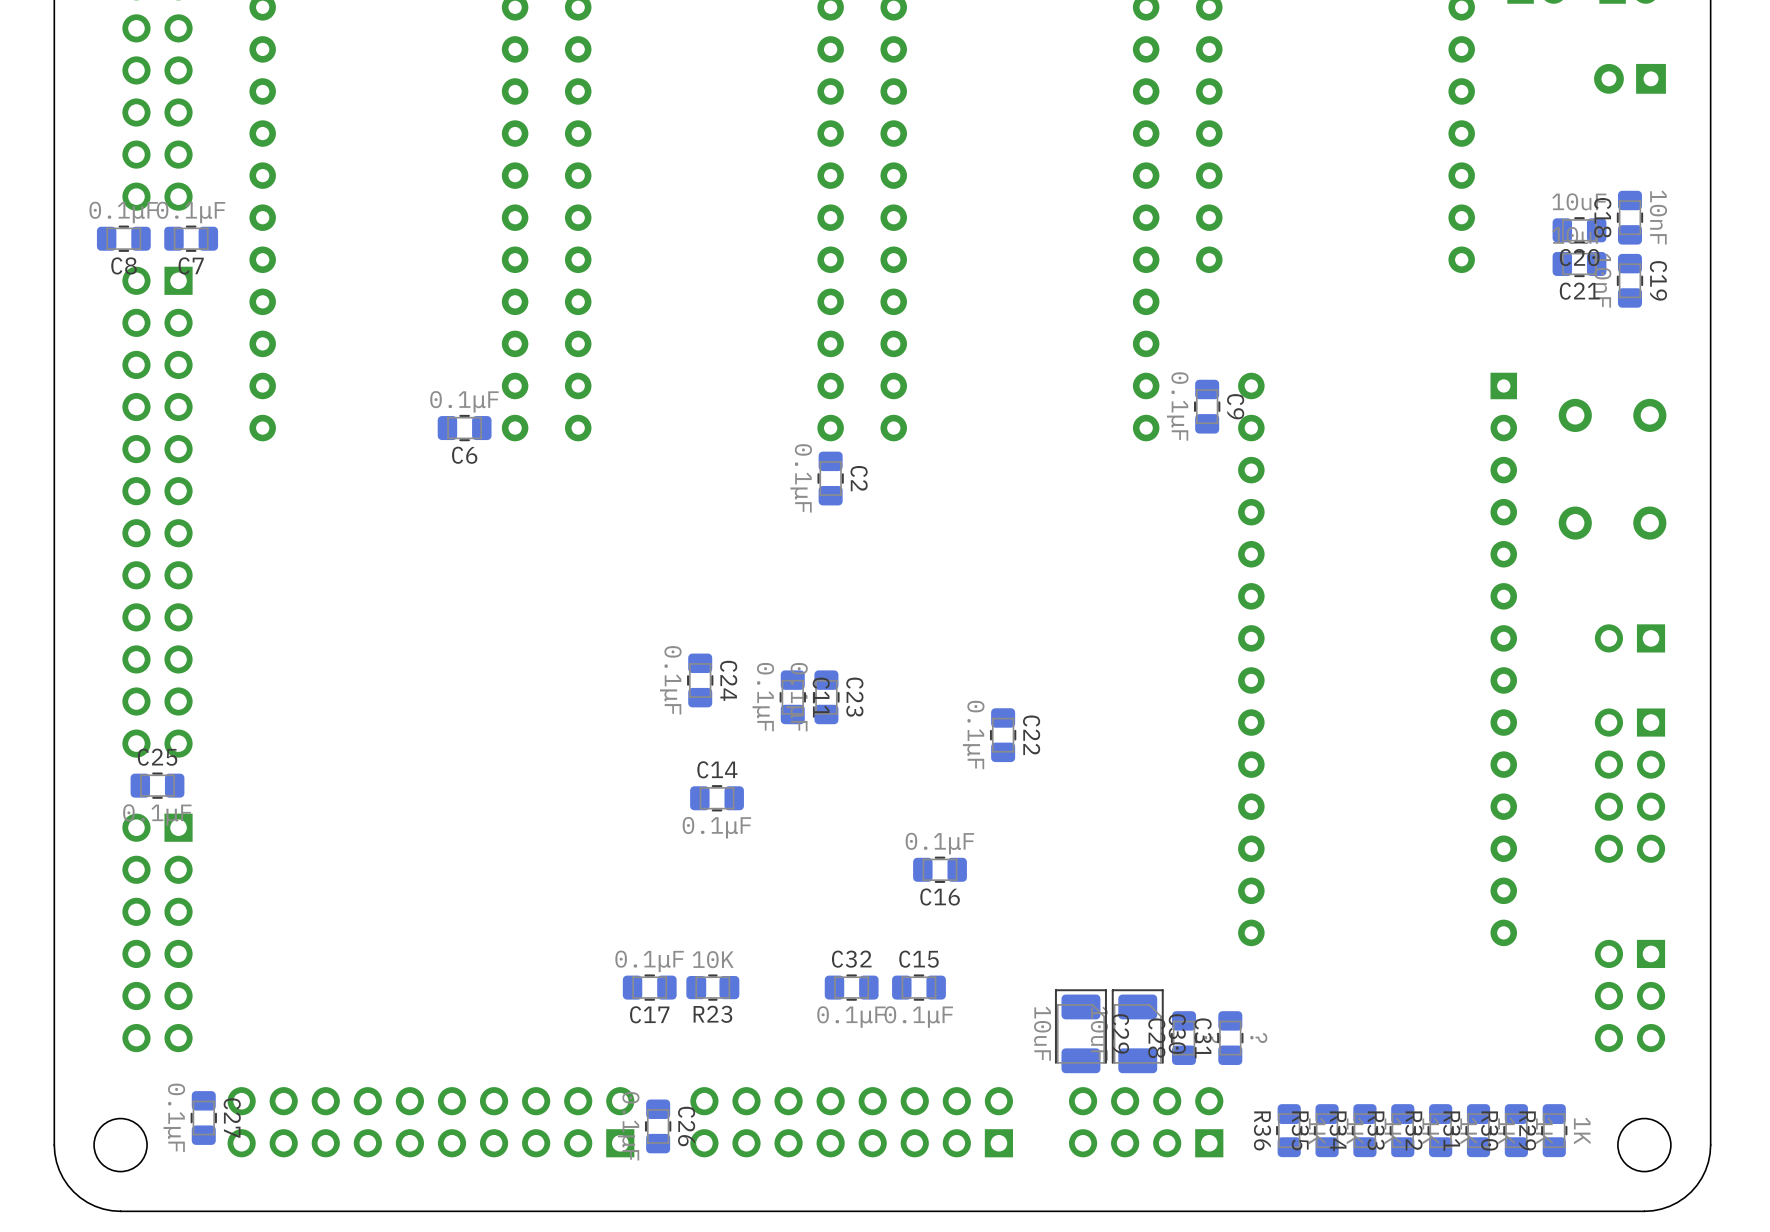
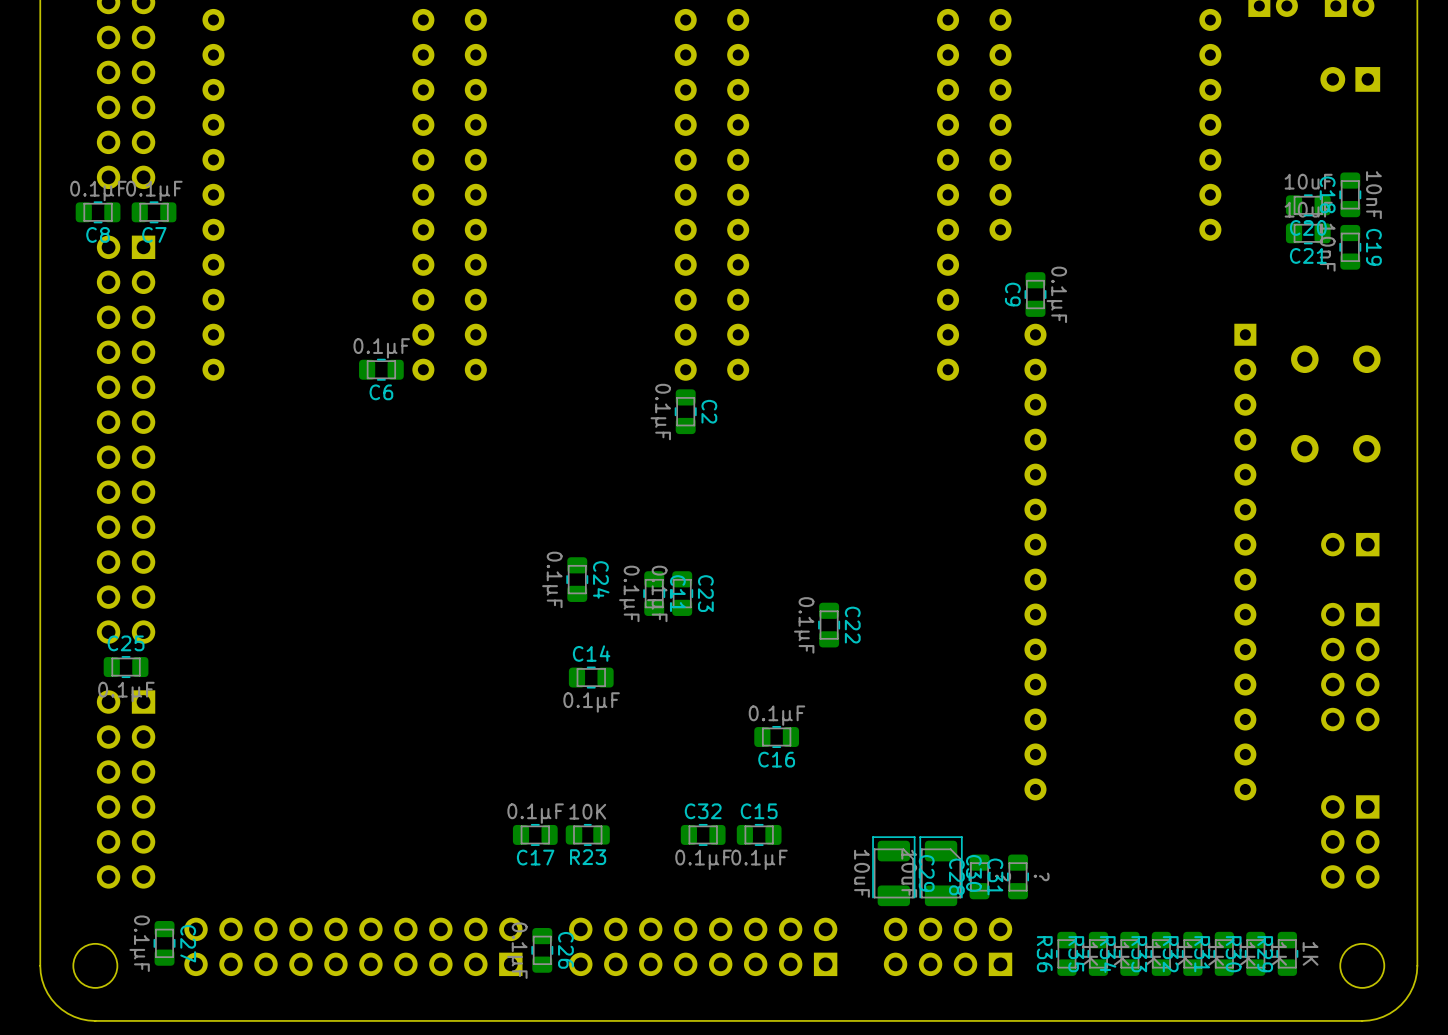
C9 value position: 0.1μF (1177, 406) -> 0.1μF (1056, 294)
C9 position: (1207, 406) -> (1035, 294)
C9 name position: C9 (1235, 406) -> C9 (1012, 294)

